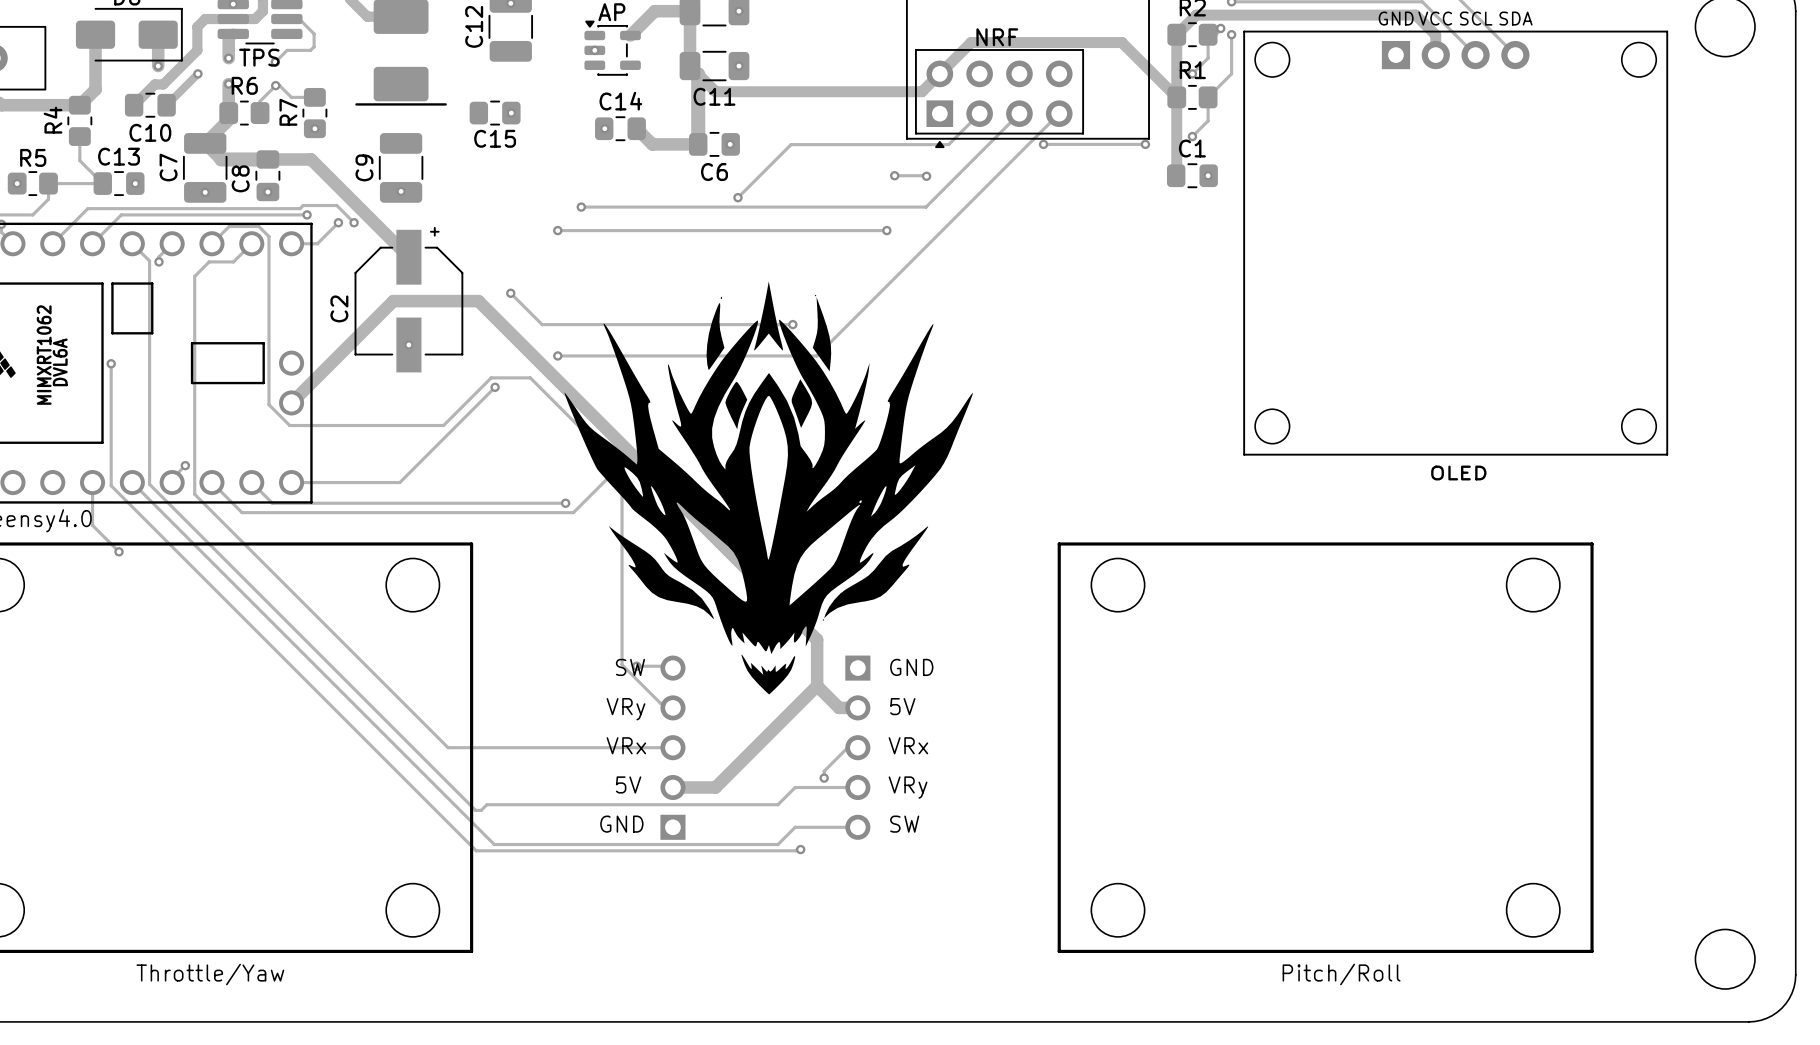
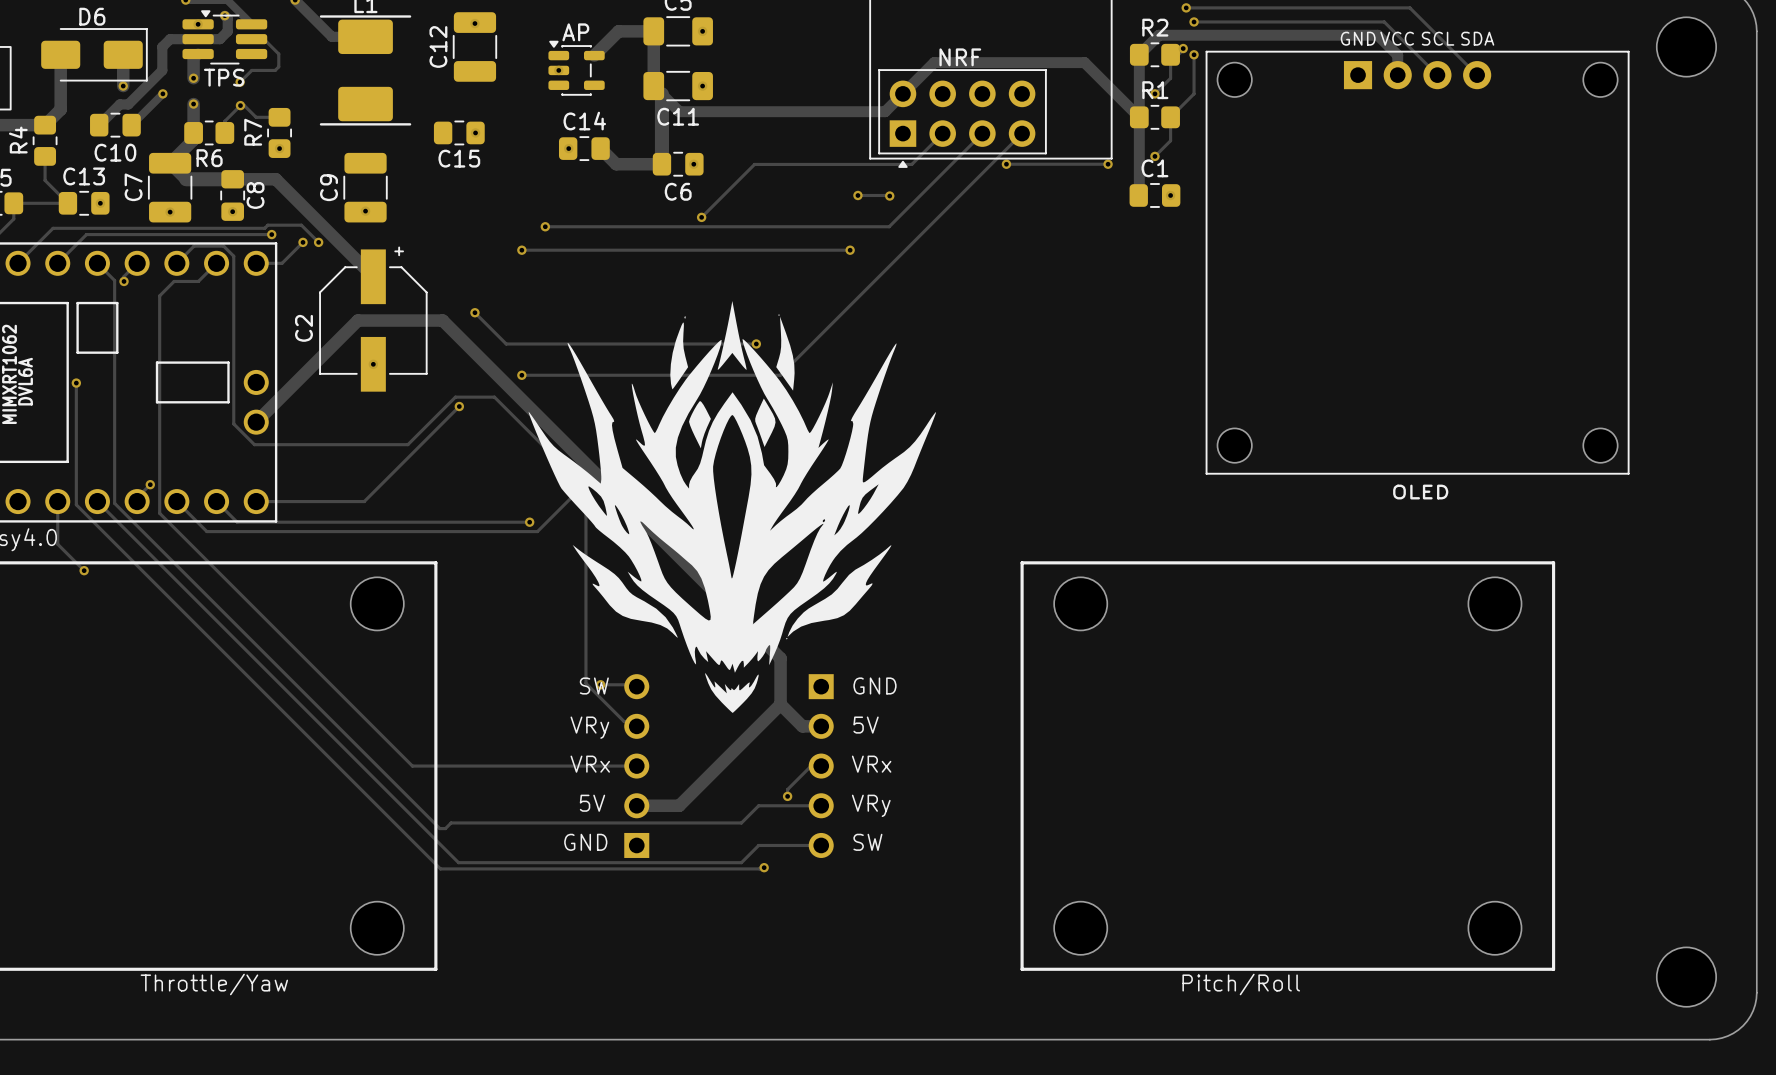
R6 name position: R6 (244, 85) -> R6 (209, 158)
C8 name position: C8 (240, 178) -> C8 (255, 195)
text position: Throttle/Yaw (210, 974) -> Throttle/Yaw (214, 984)
text position: Pitch/Roll (1341, 974) -> Pitch/Roll (1241, 984)

